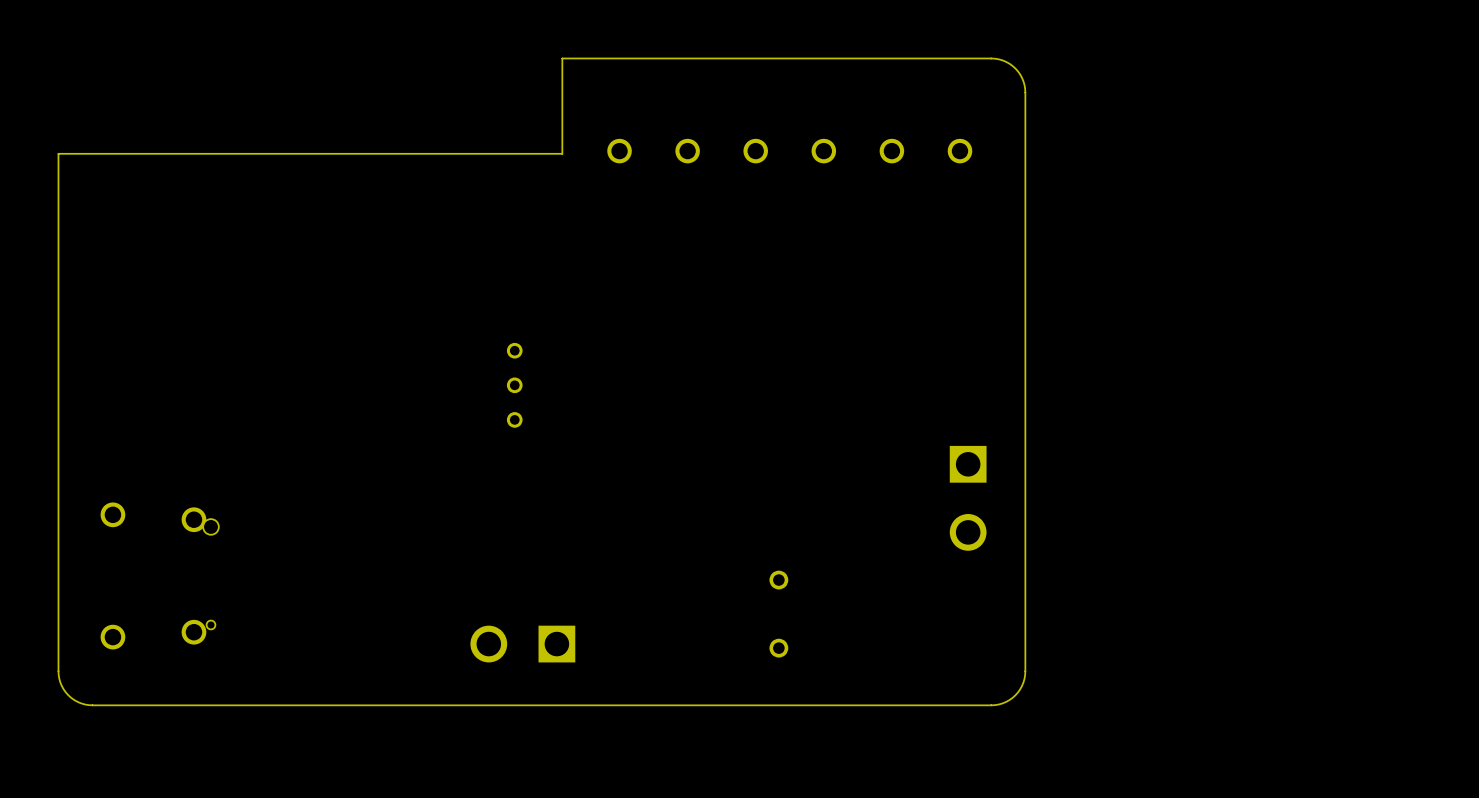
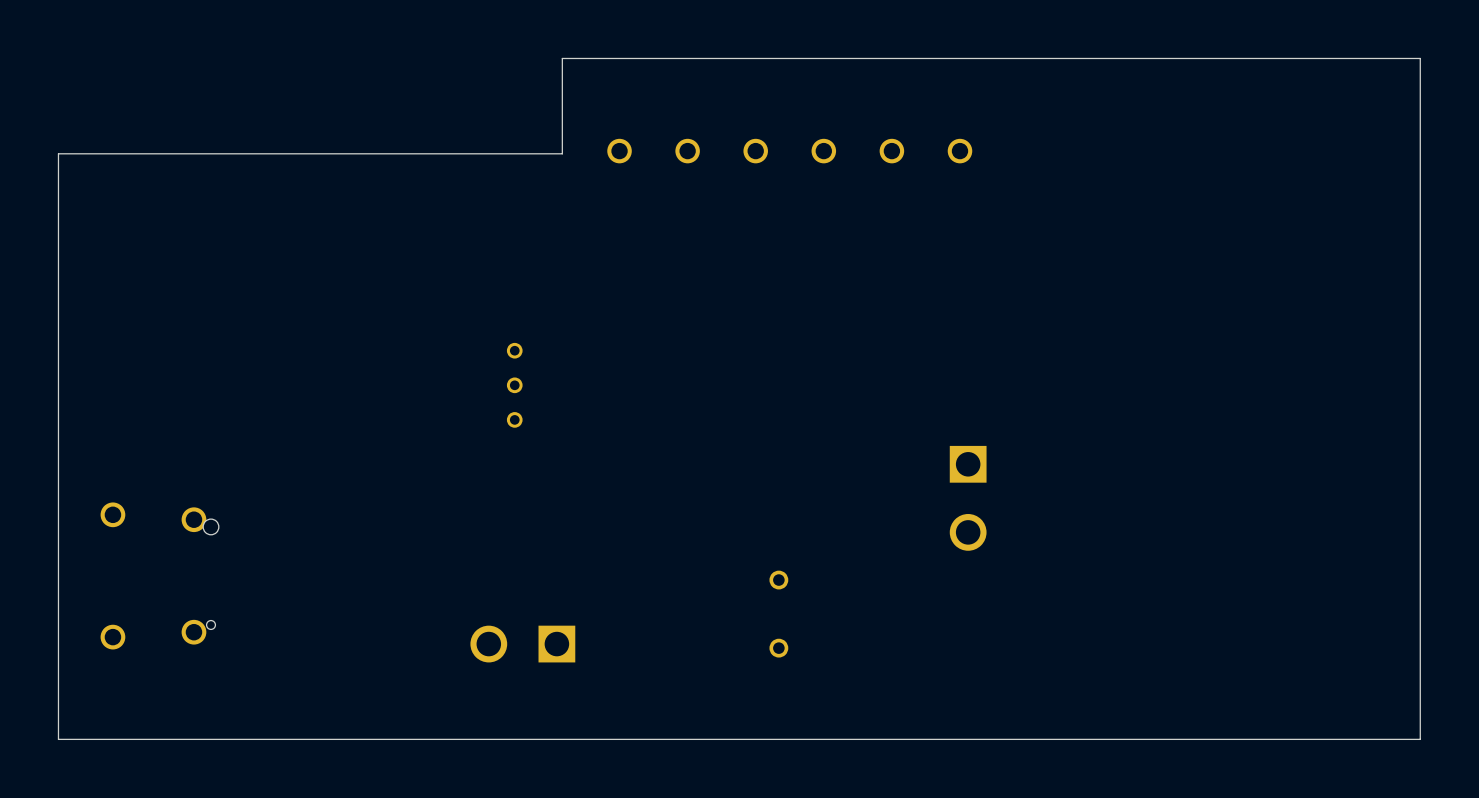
board edge: (991, 58) (1006, 61) (1015, 68) (1023, 81) (1025, 92) (1025, 671) (1020, 689) (1009, 700) (991, 705) (92, 705) (81, 703) (68, 695) (61, 686) (58, 671) -> (991, 58) (1420, 58) (1420, 739) (58, 739) (58, 671)

